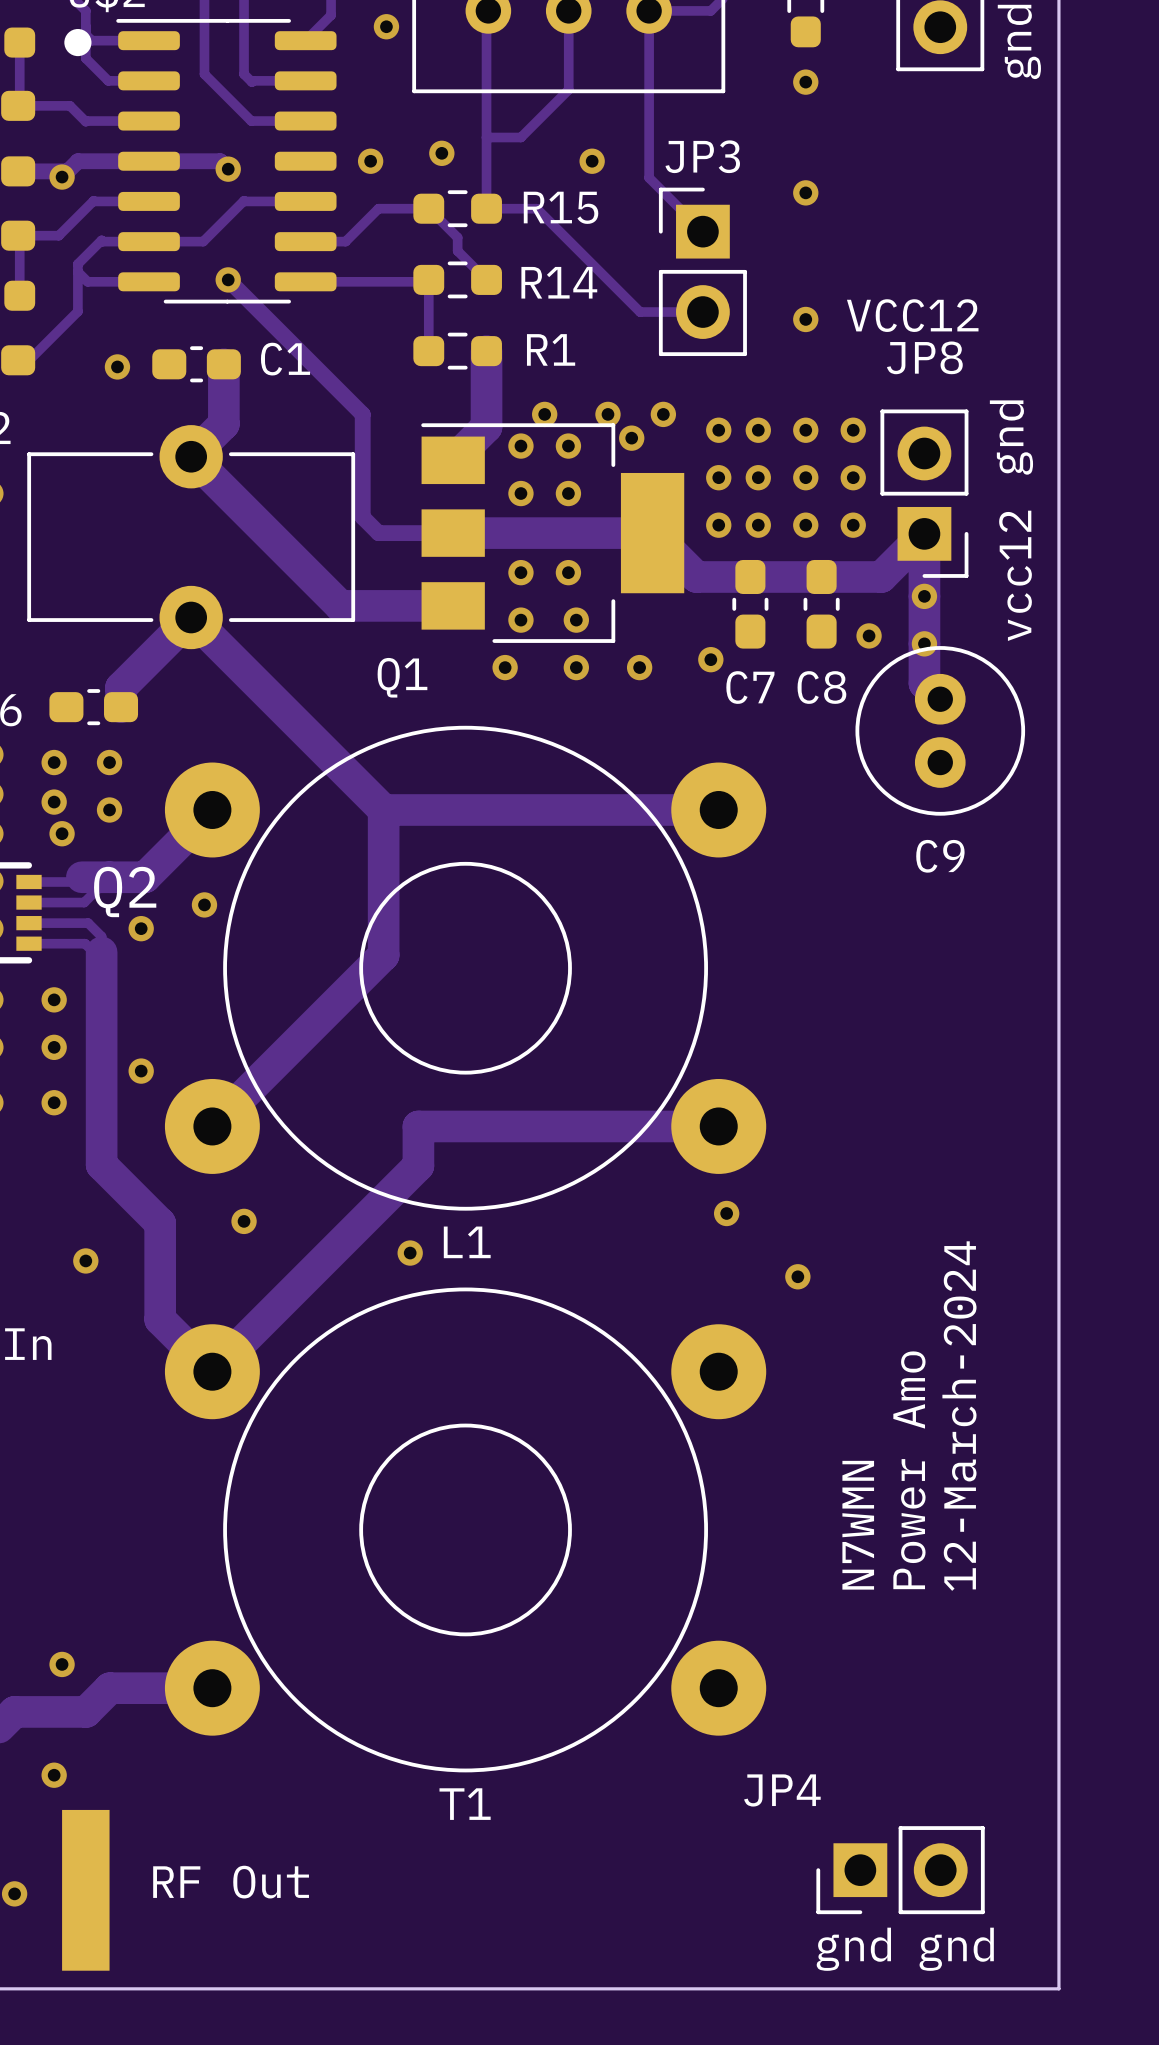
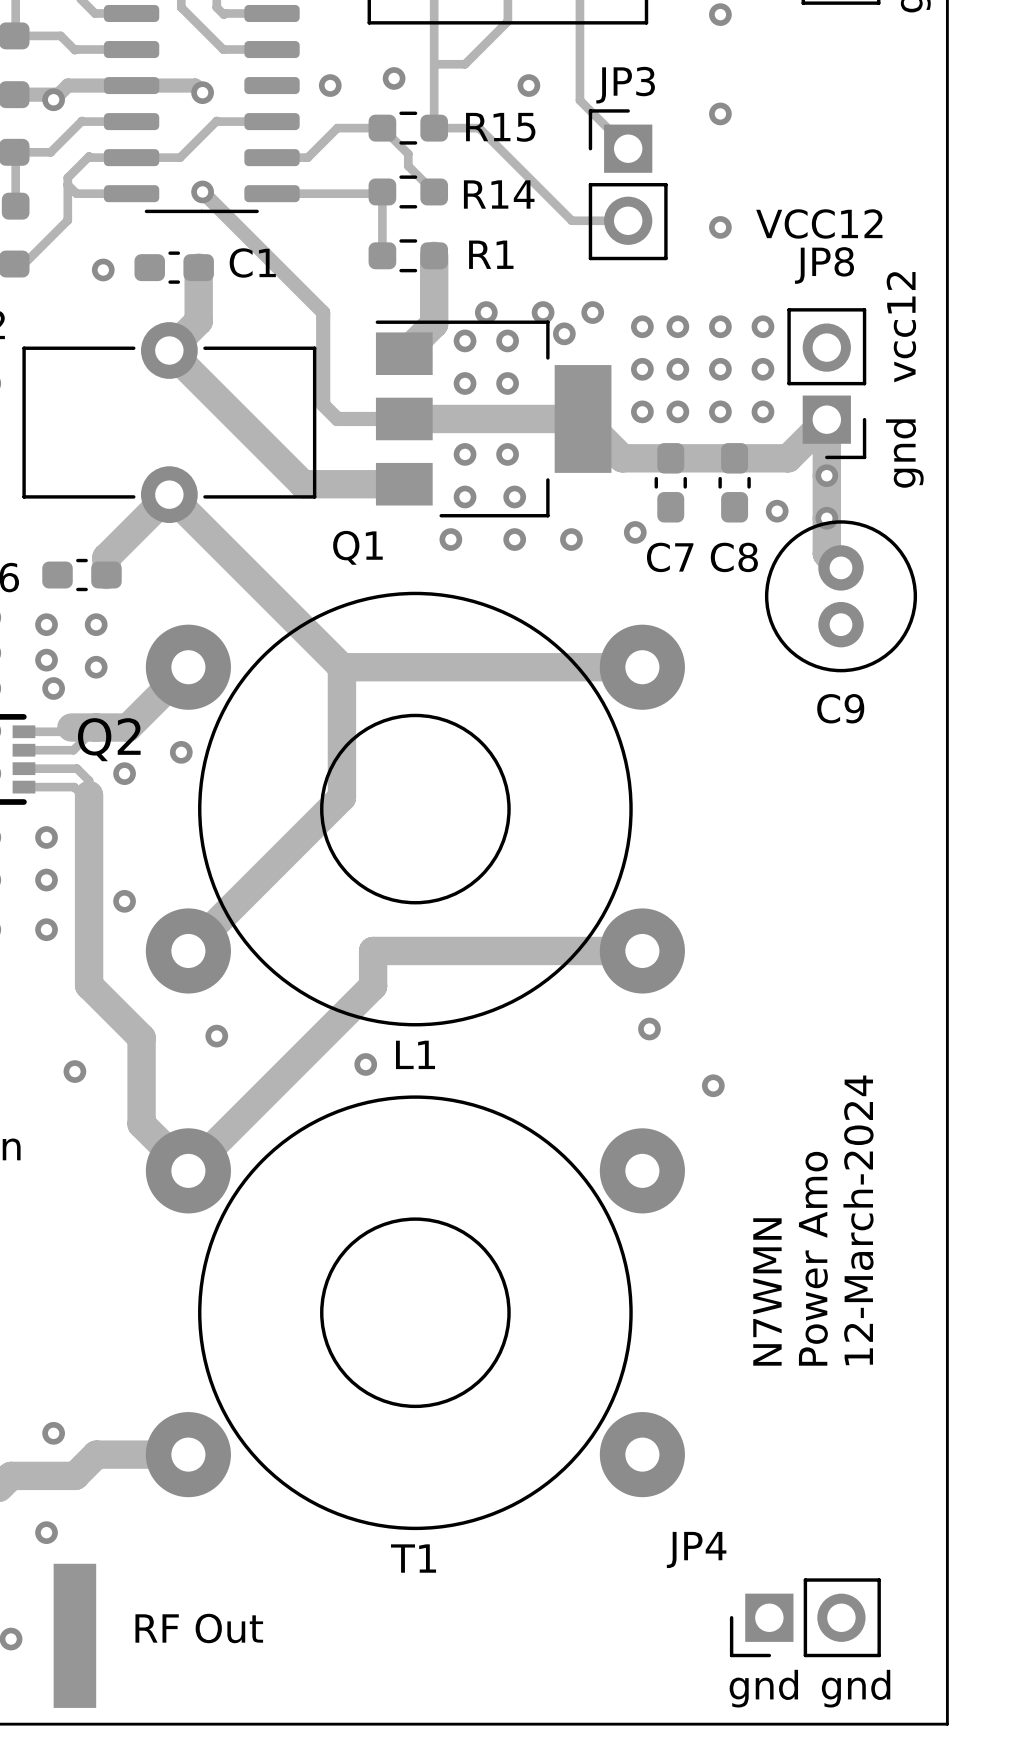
text position: gnd (1011, 437) -> gnd (904, 453)
text position: vcc12 (1015, 575) -> vcc12 (901, 327)

